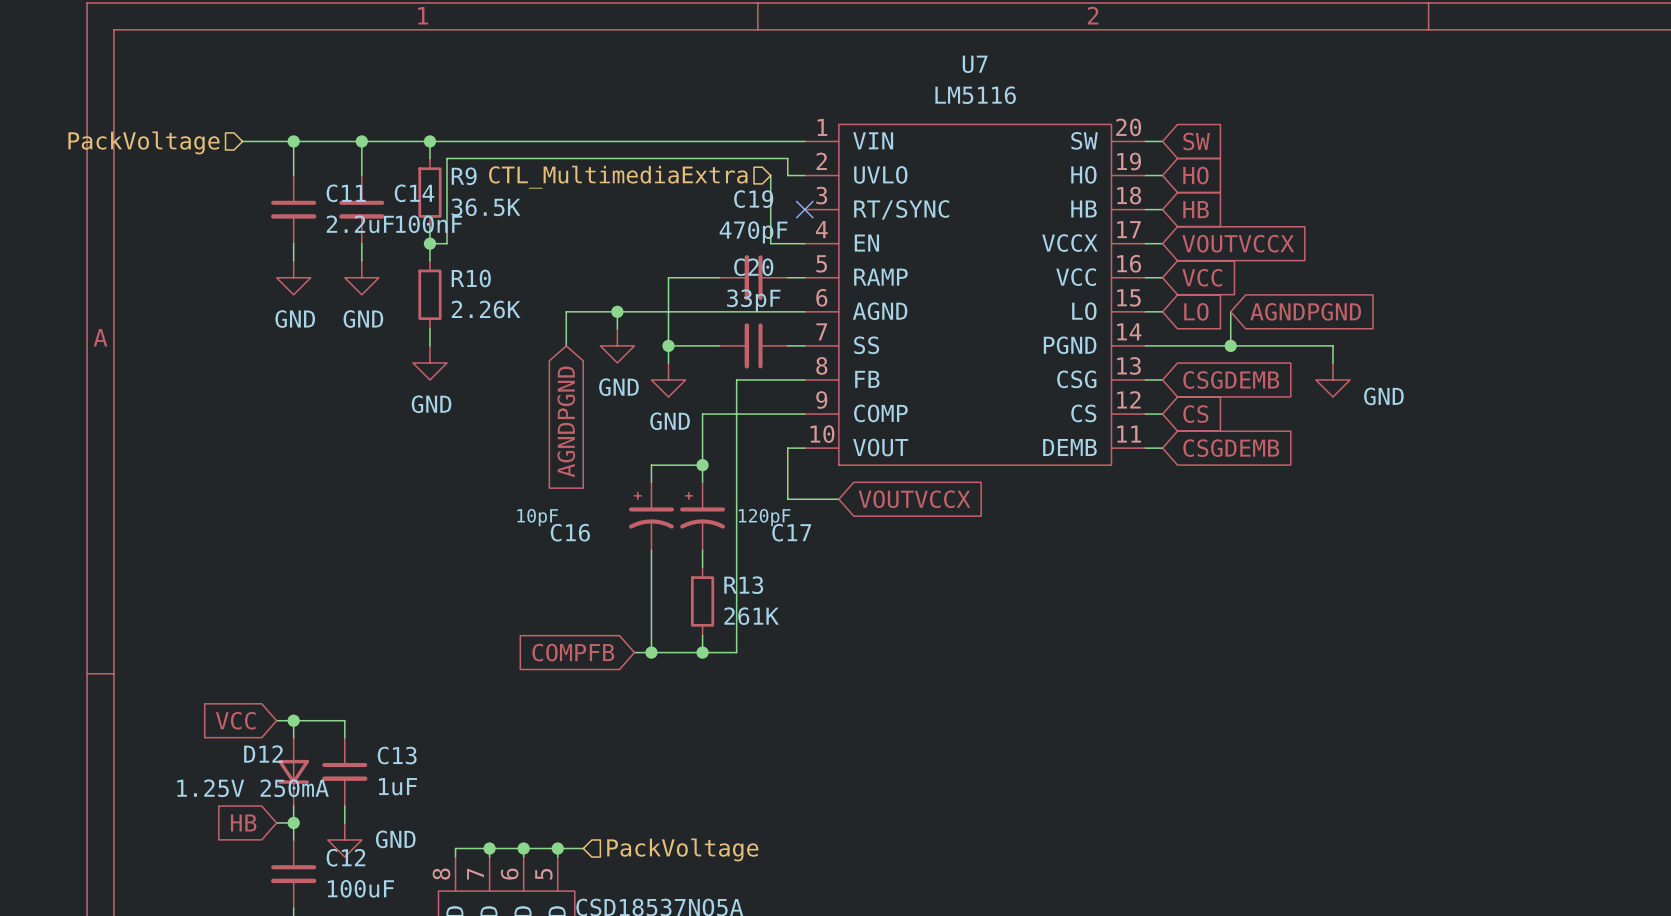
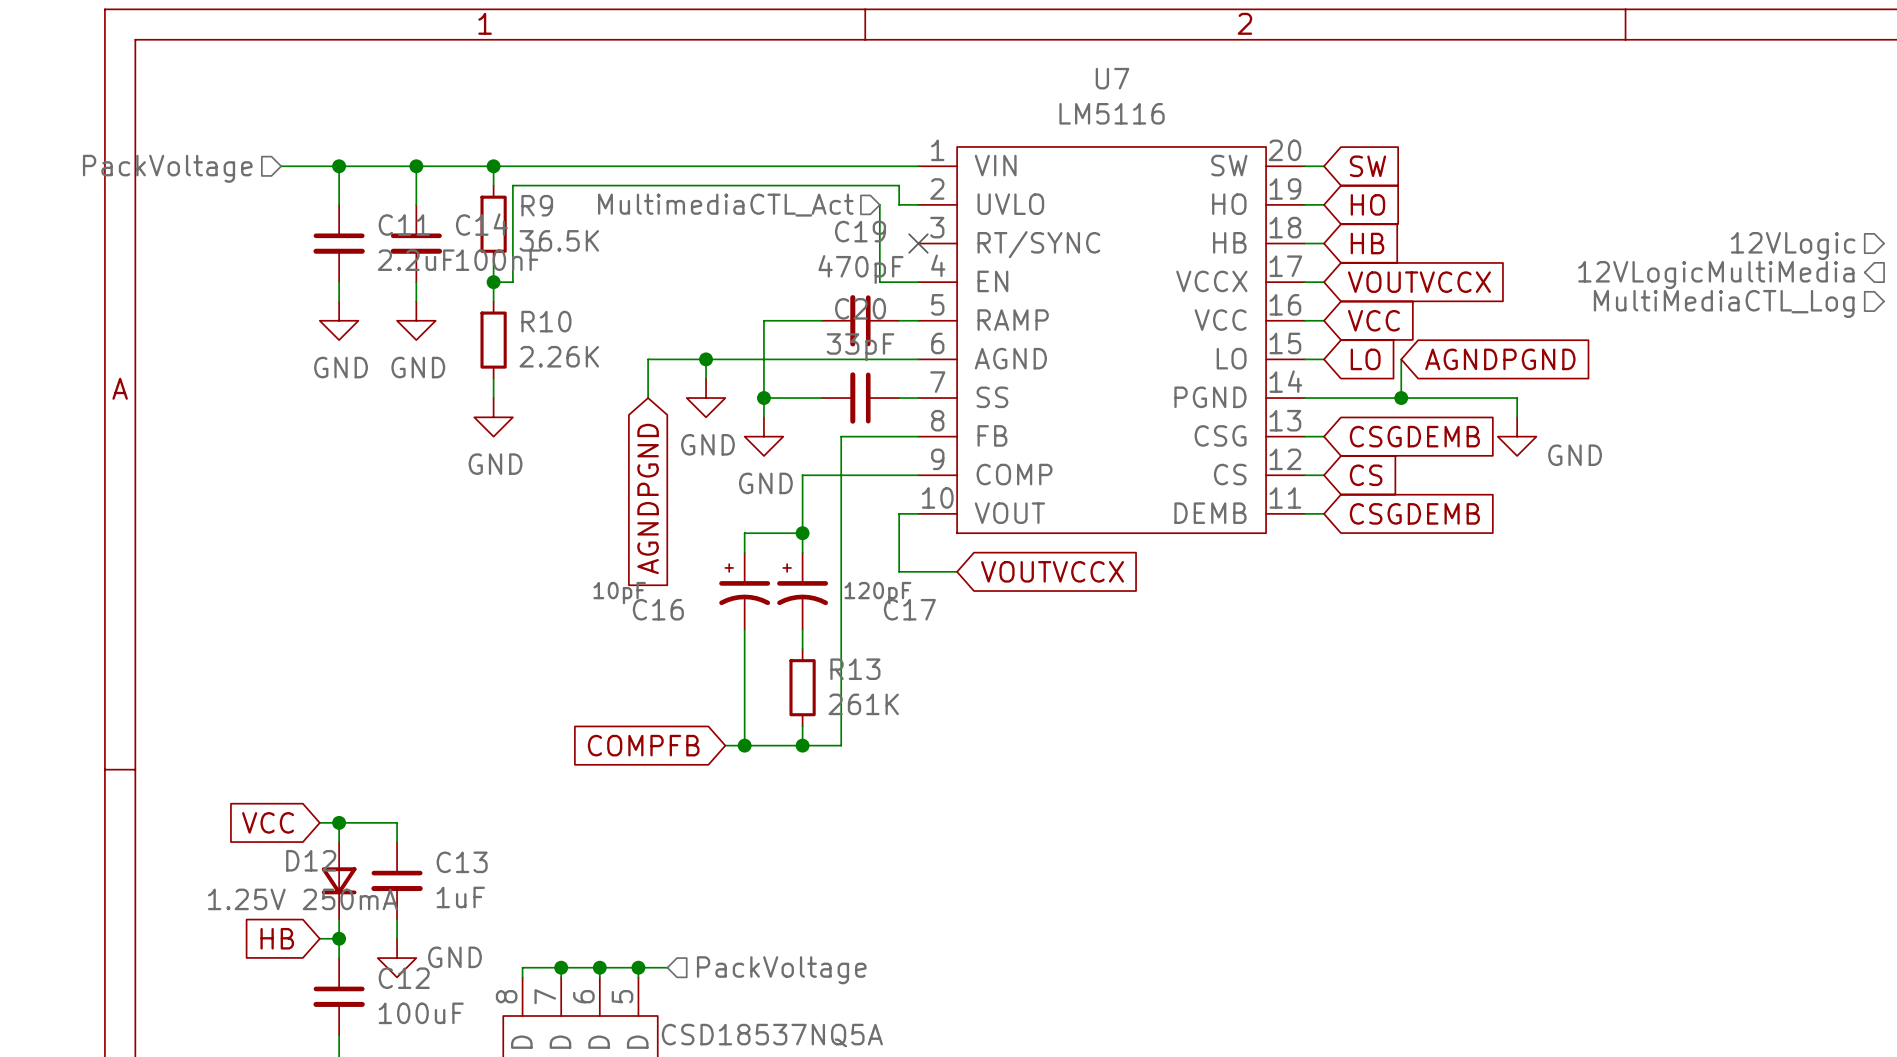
hierarchical label: CTL_MultimediaExtra (618, 177) -> MultimediaCTL_Act (725, 205)
hierarchical label: none -> 12VLogic (1793, 246)
hierarchical label: none -> 12VLogicMultiMedia (1716, 274)
hierarchical label: none -> MultiMediaCTL_Log (1724, 303)

